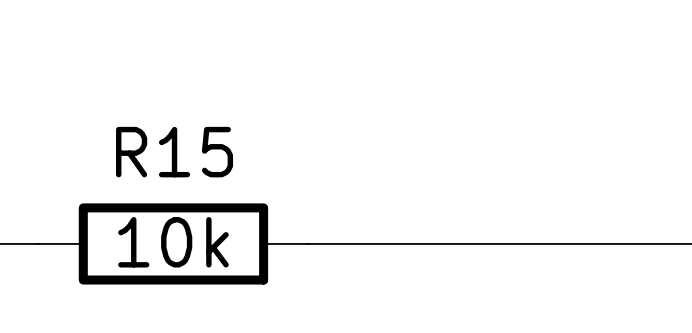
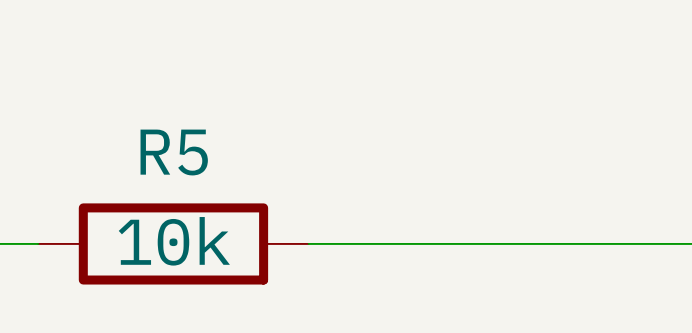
R15 name: R15 (174, 152) -> R5 (174, 152)

